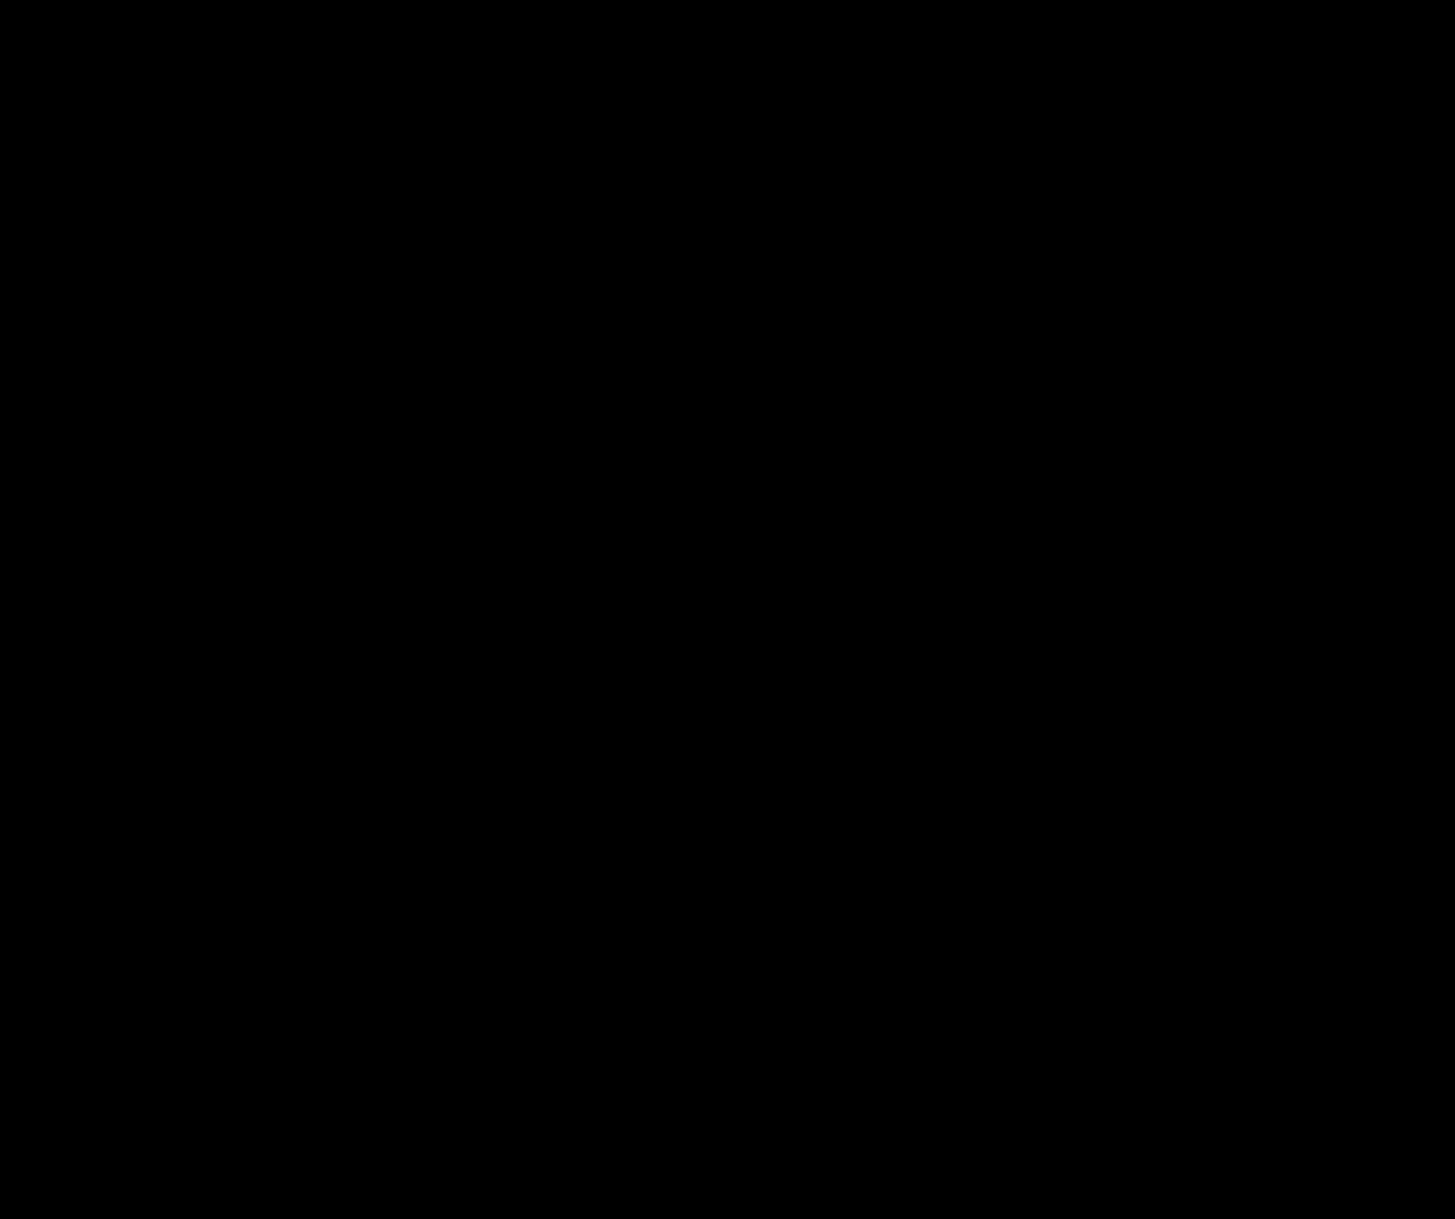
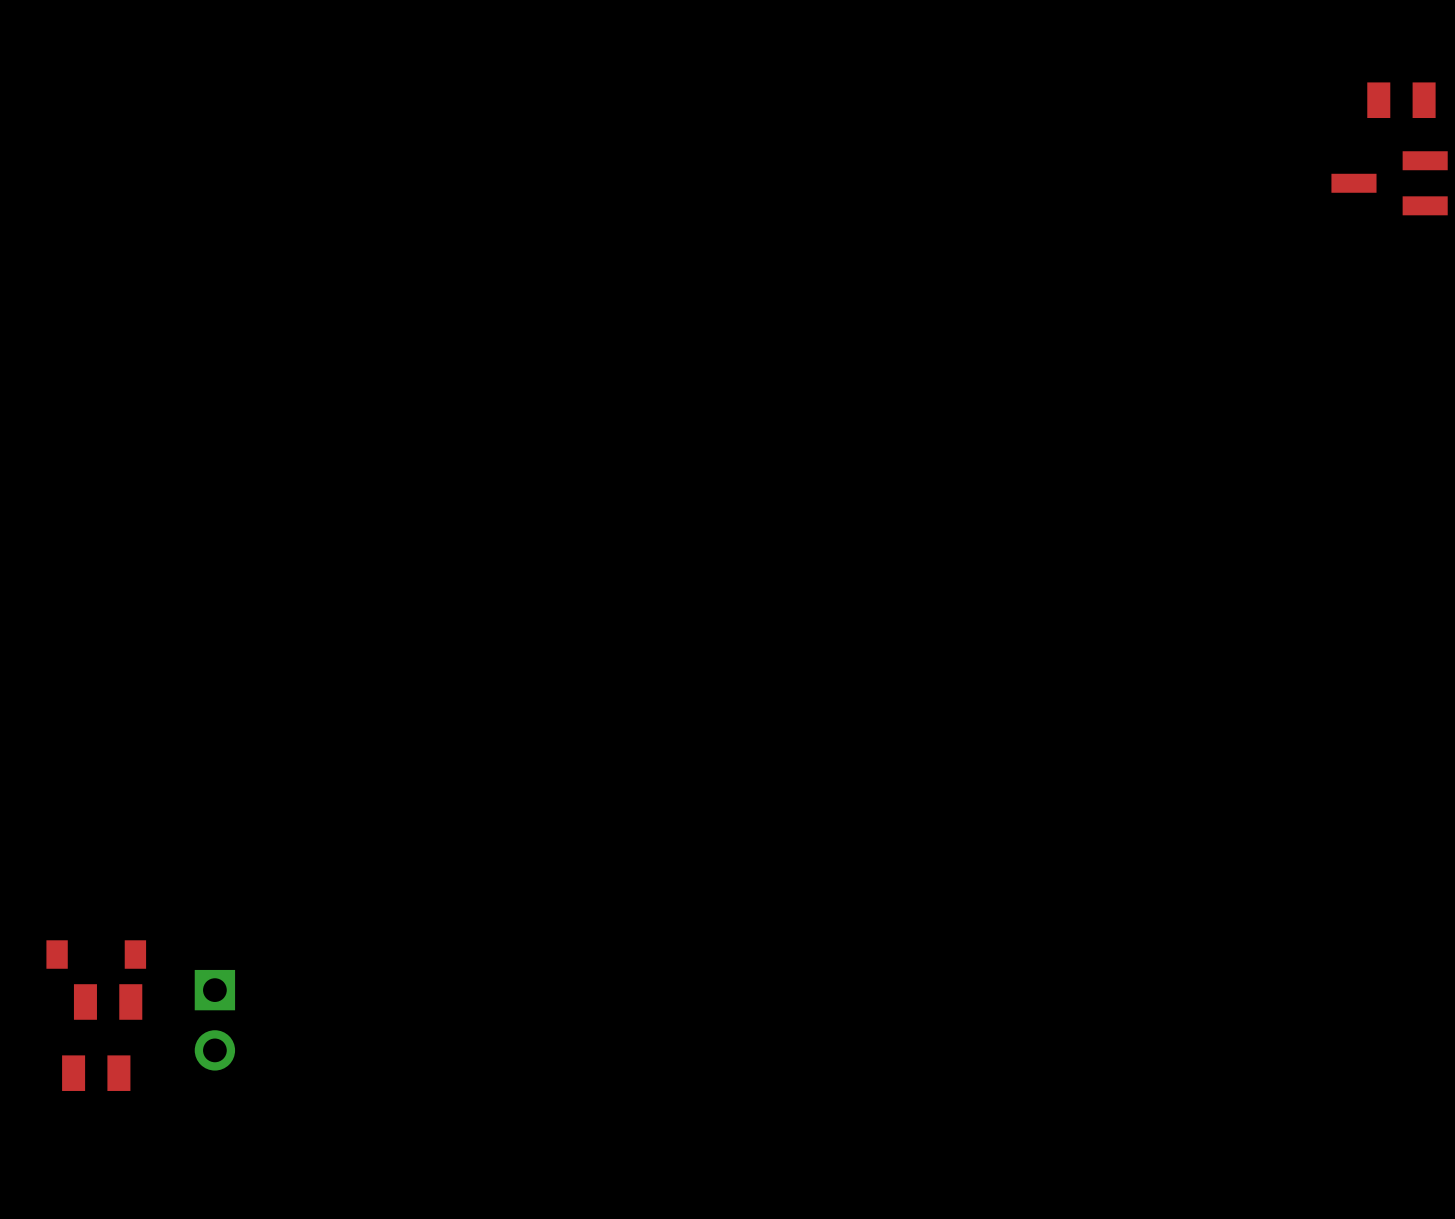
part: none -> (1401, 100)
part: none -> (1389, 183)
part: none -> (96, 954)
part: none -> (108, 1001)
part: none -> (214, 1020)
part: none -> (96, 1073)

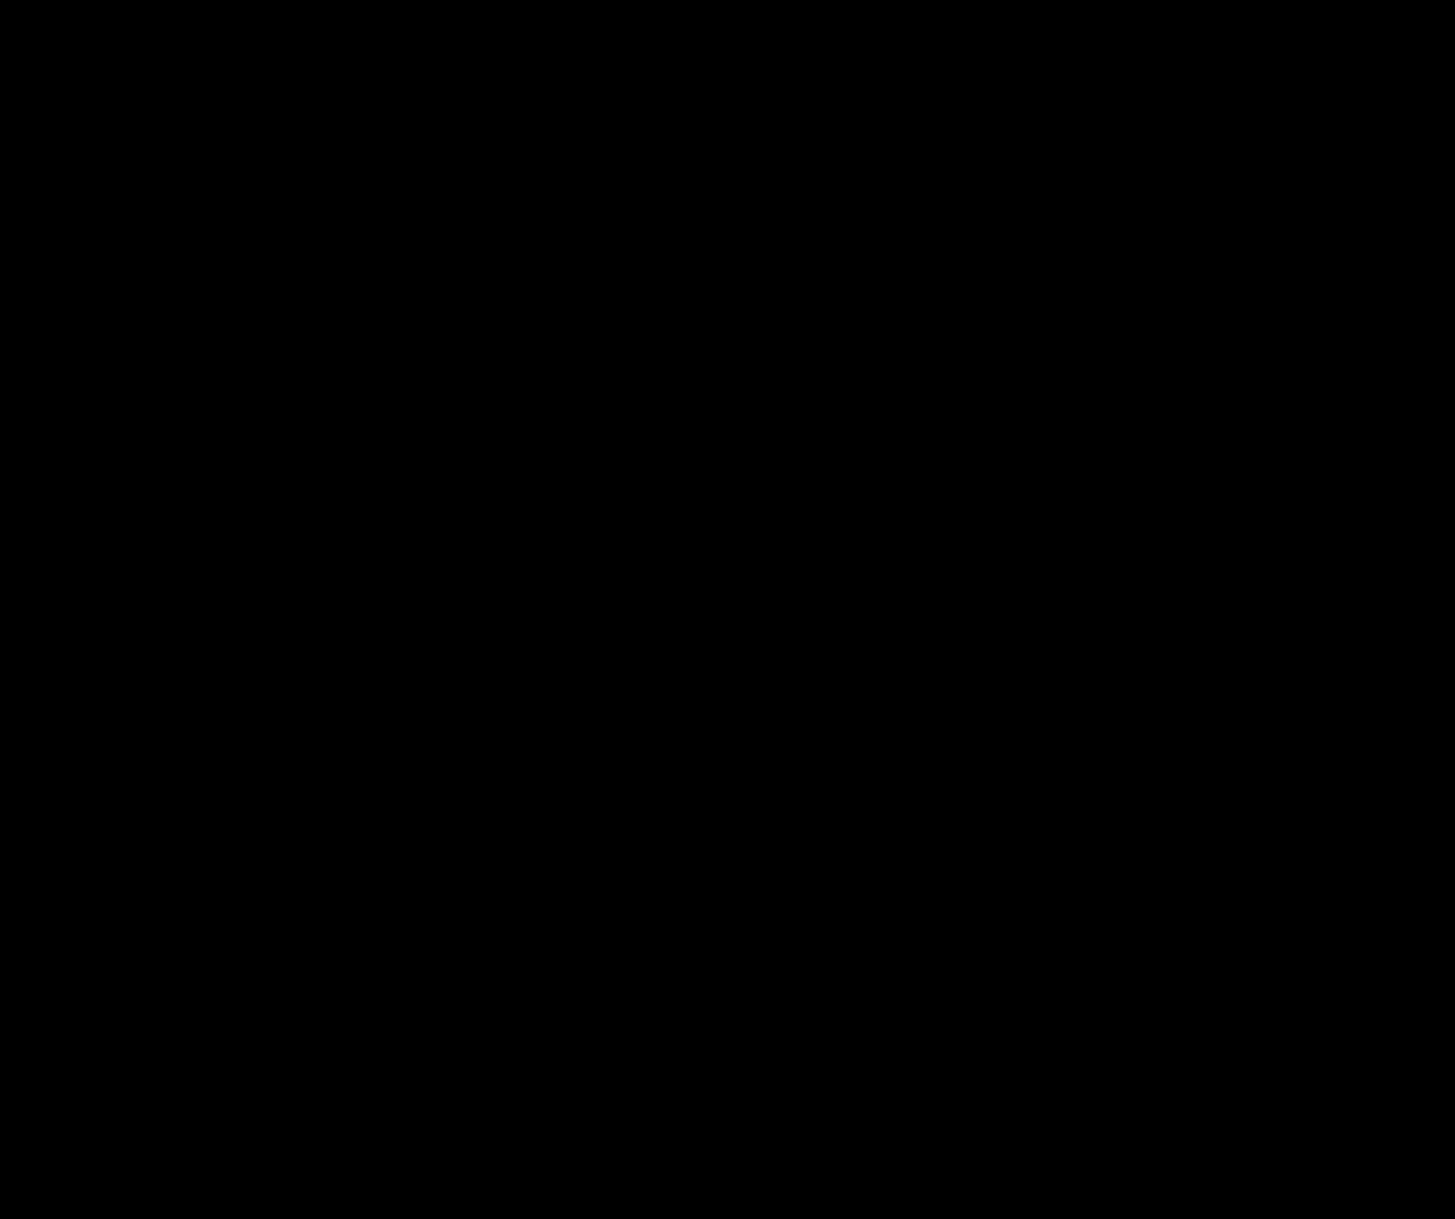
part: (1401, 100) -> none
part: (1389, 183) -> none
part: (96, 954) -> none
part: (108, 1001) -> none
part: (214, 1020) -> none
part: (96, 1073) -> none

